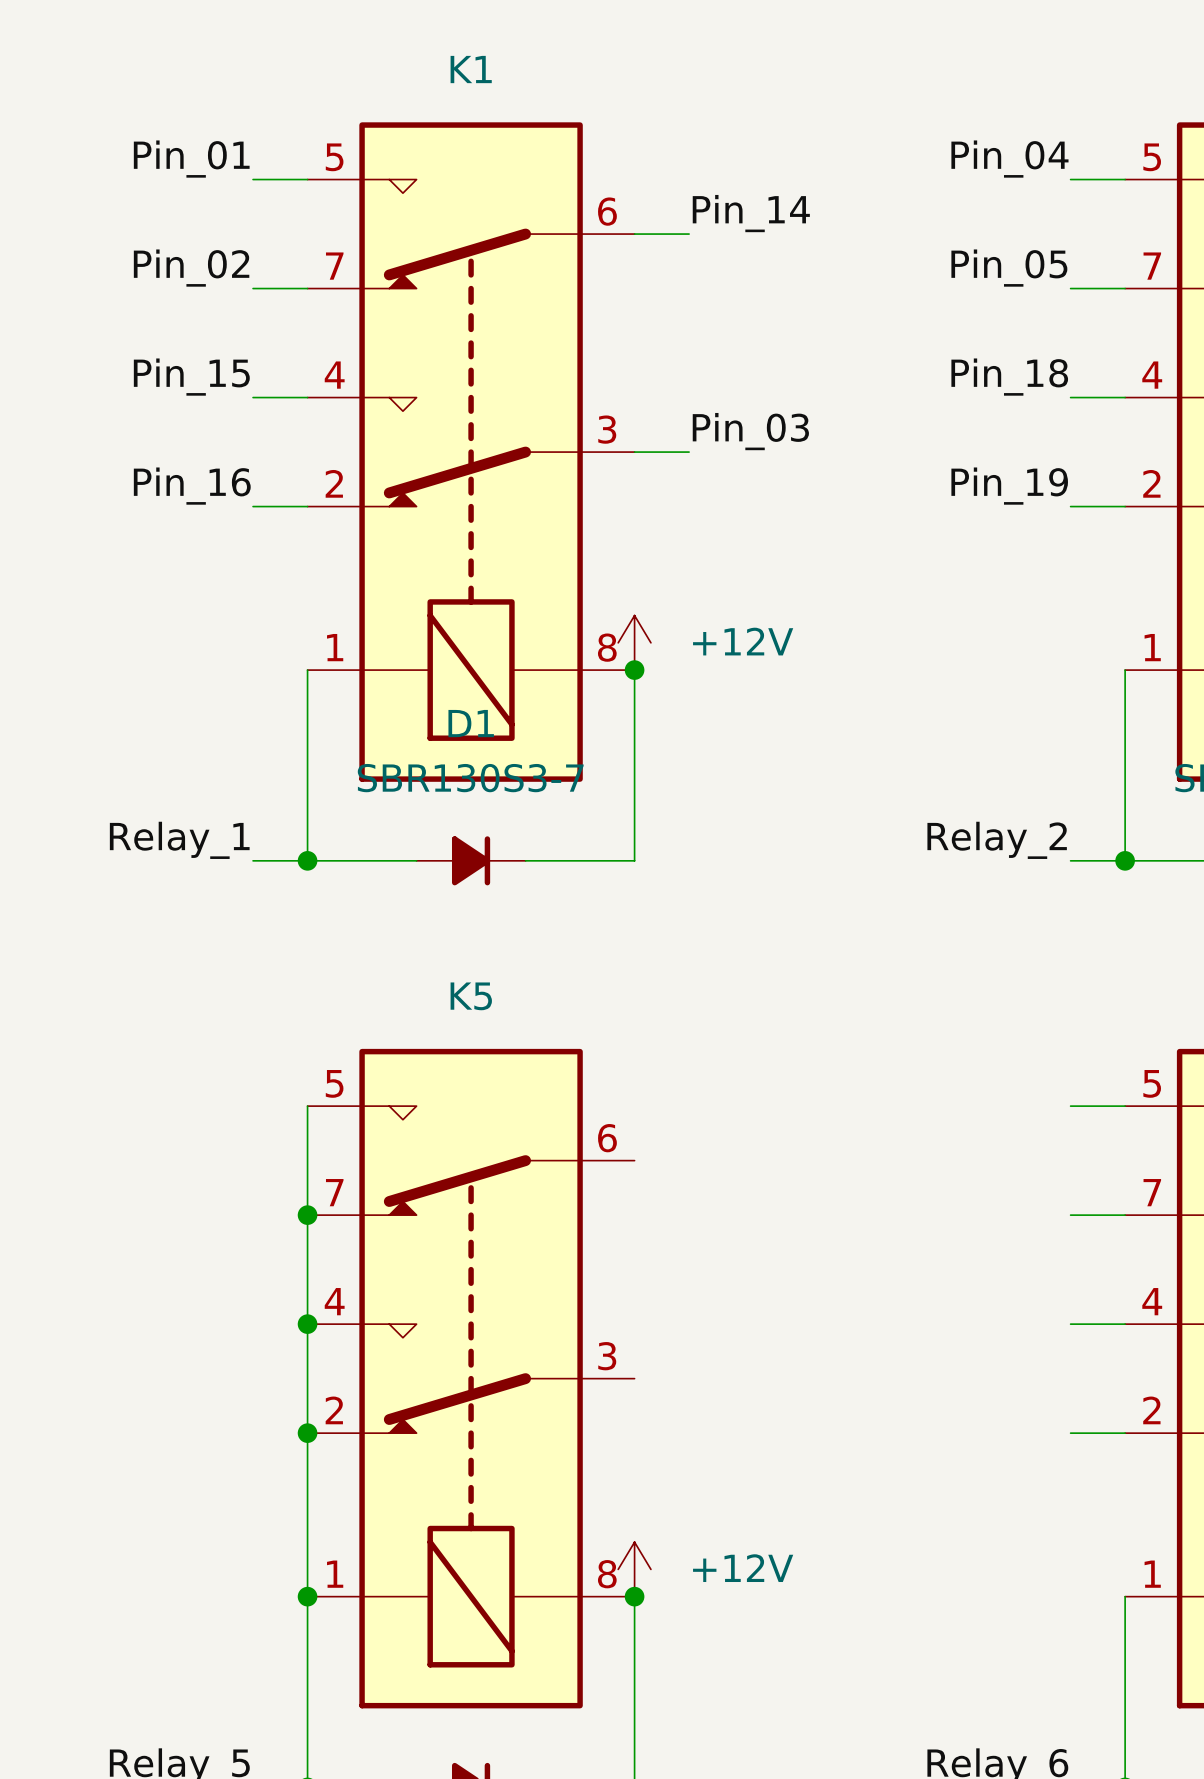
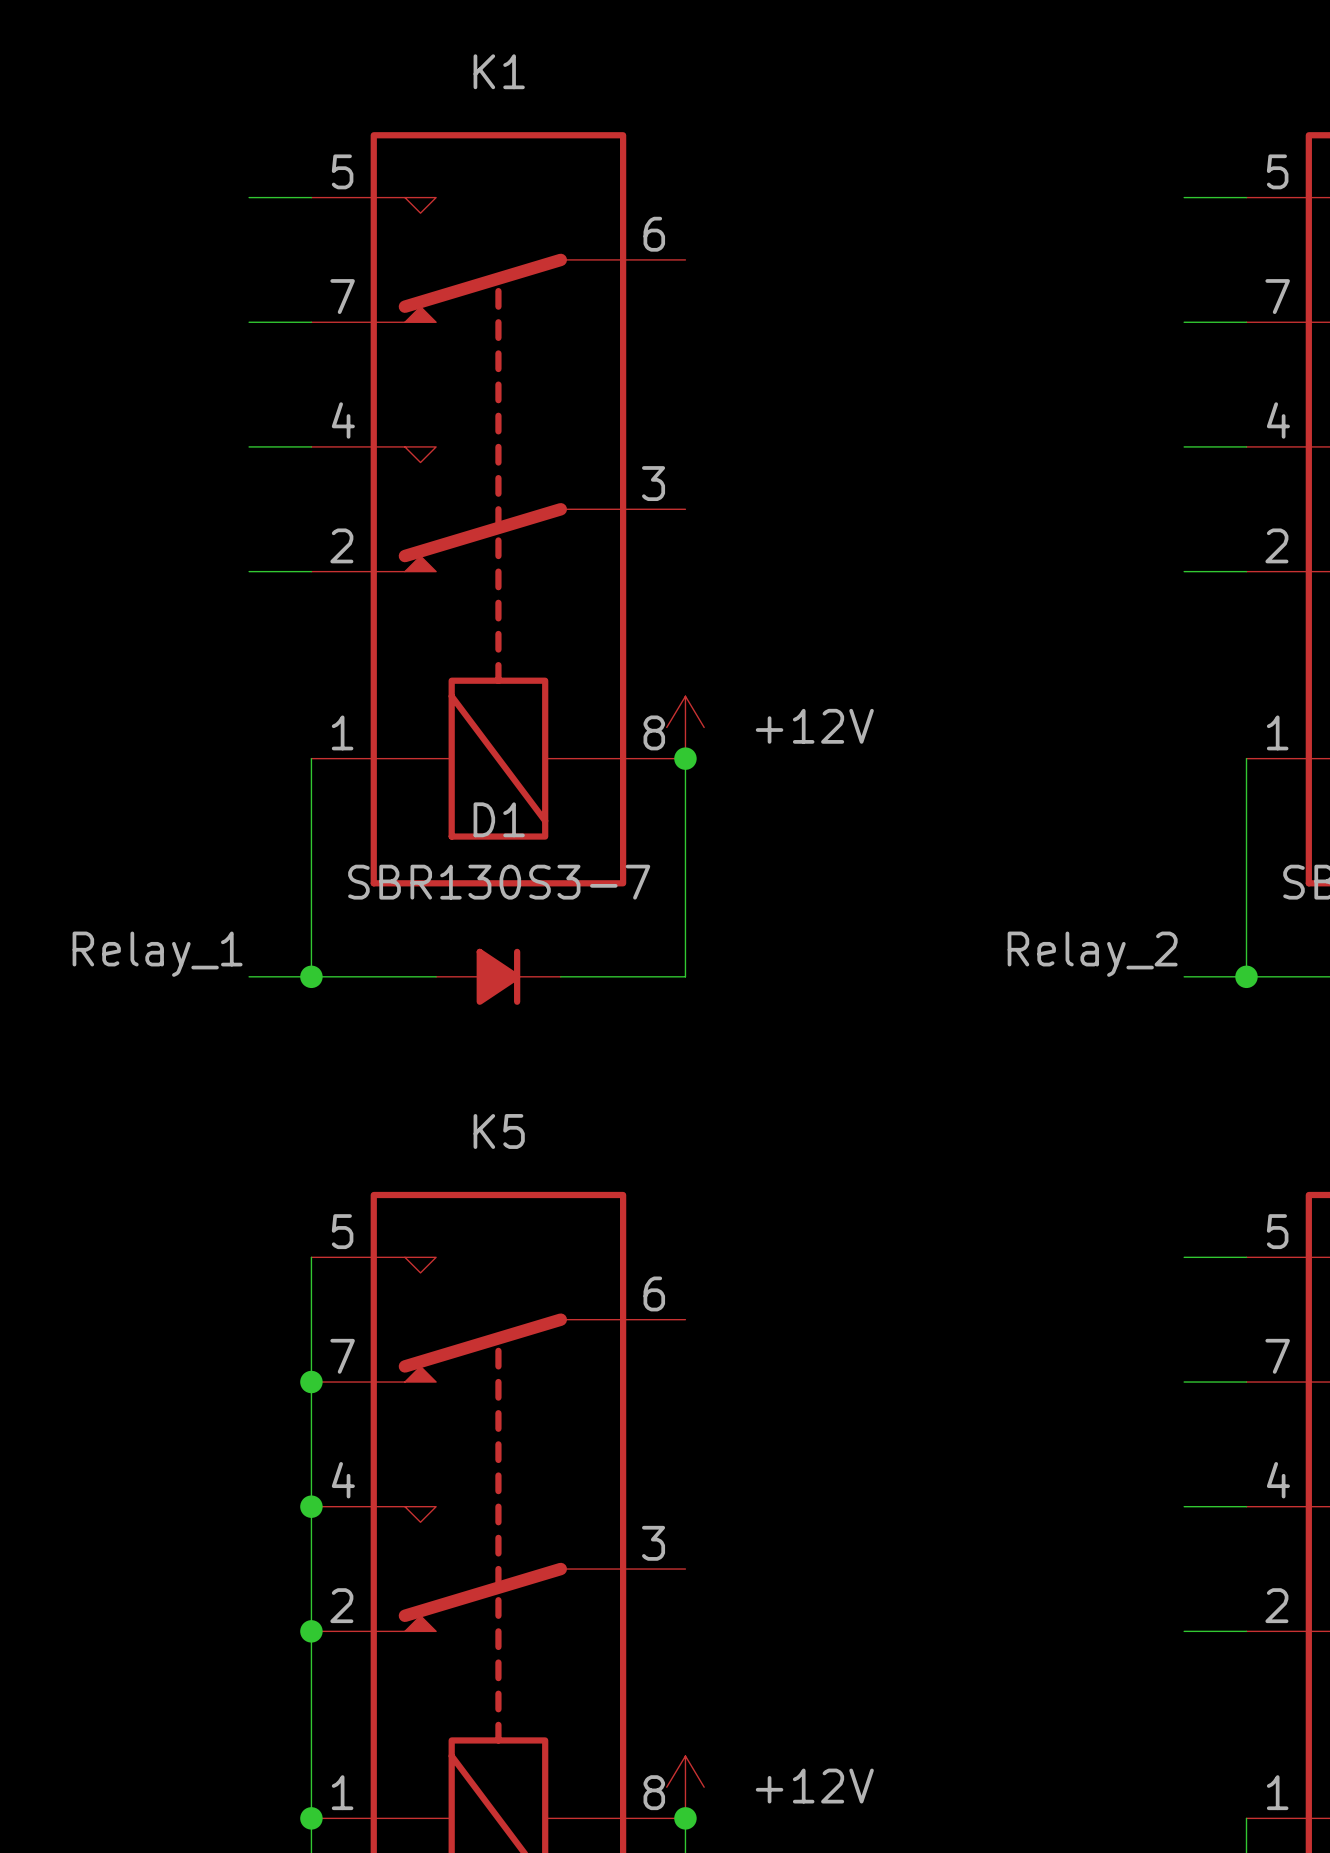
label: Pin_01 (191, 159) -> none
label: Pin_04 (1009, 159) -> none
label: Pin_14 (751, 213) -> none
wire: (634, 234) (689, 234) -> none
label: Pin_02 (191, 268) -> none
label: Pin_05 (1009, 268) -> none
label: Pin_15 (191, 377) -> none
label: Pin_18 (1009, 377) -> none
label: Pin_03 (750, 431) -> none
wire: (634, 452) (689, 452) -> none
label: Pin_16 (192, 486) -> none
label: Pin_19 (1009, 486) -> none

